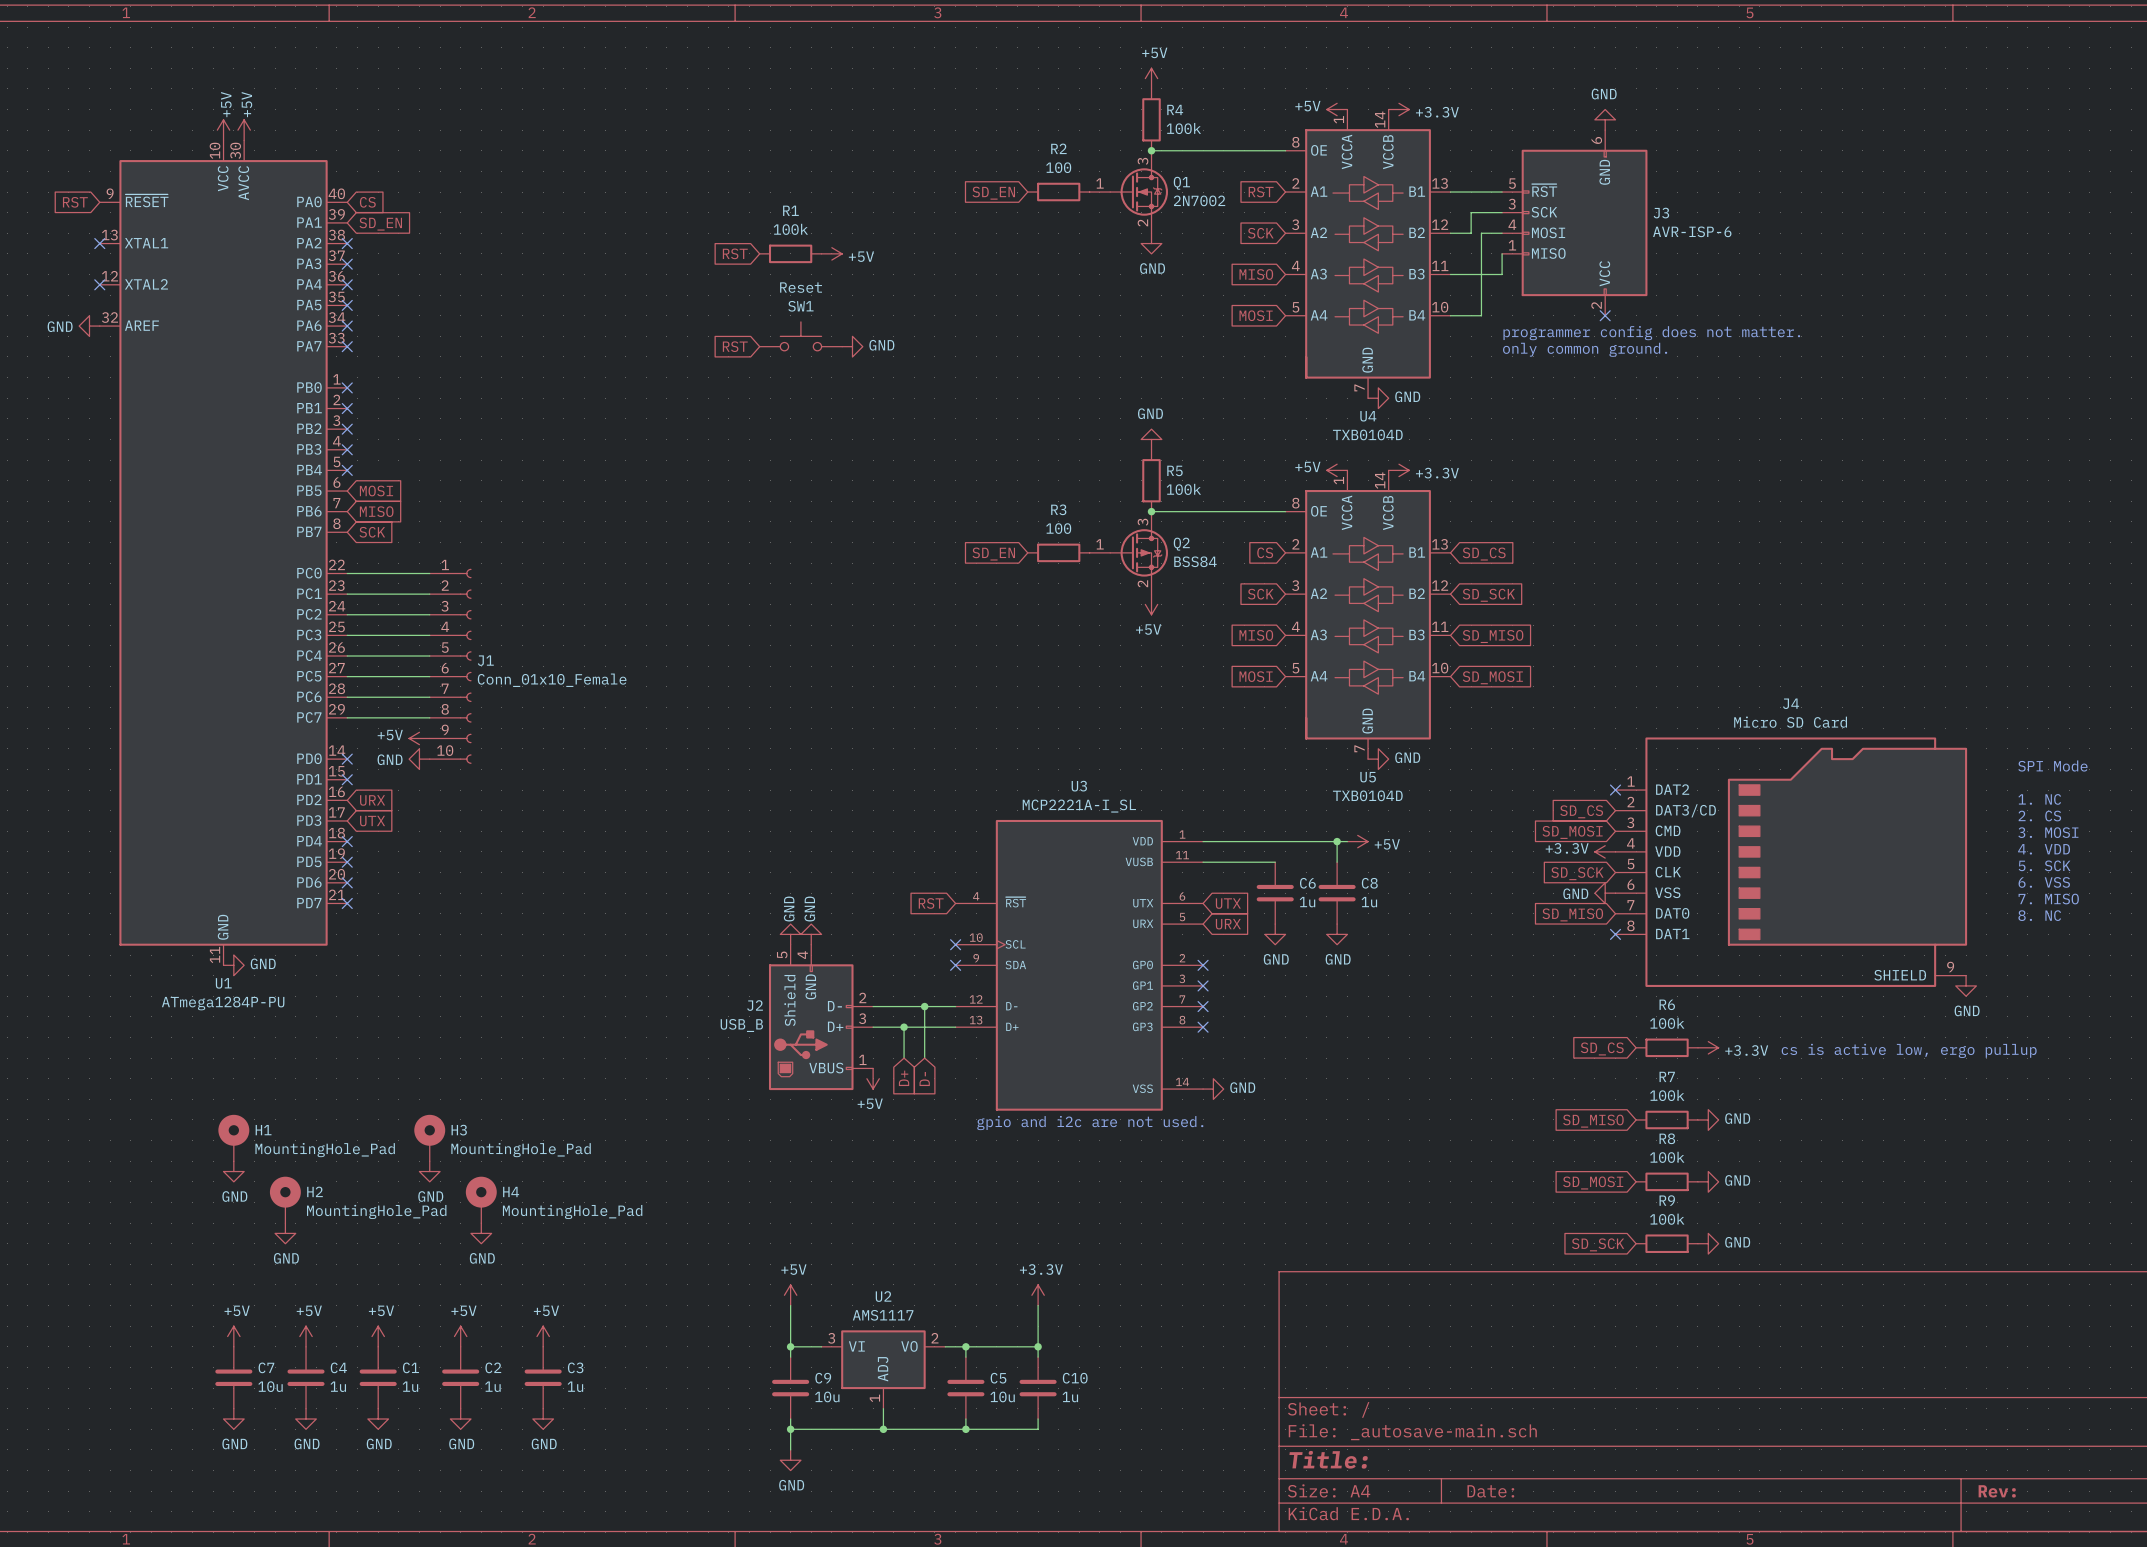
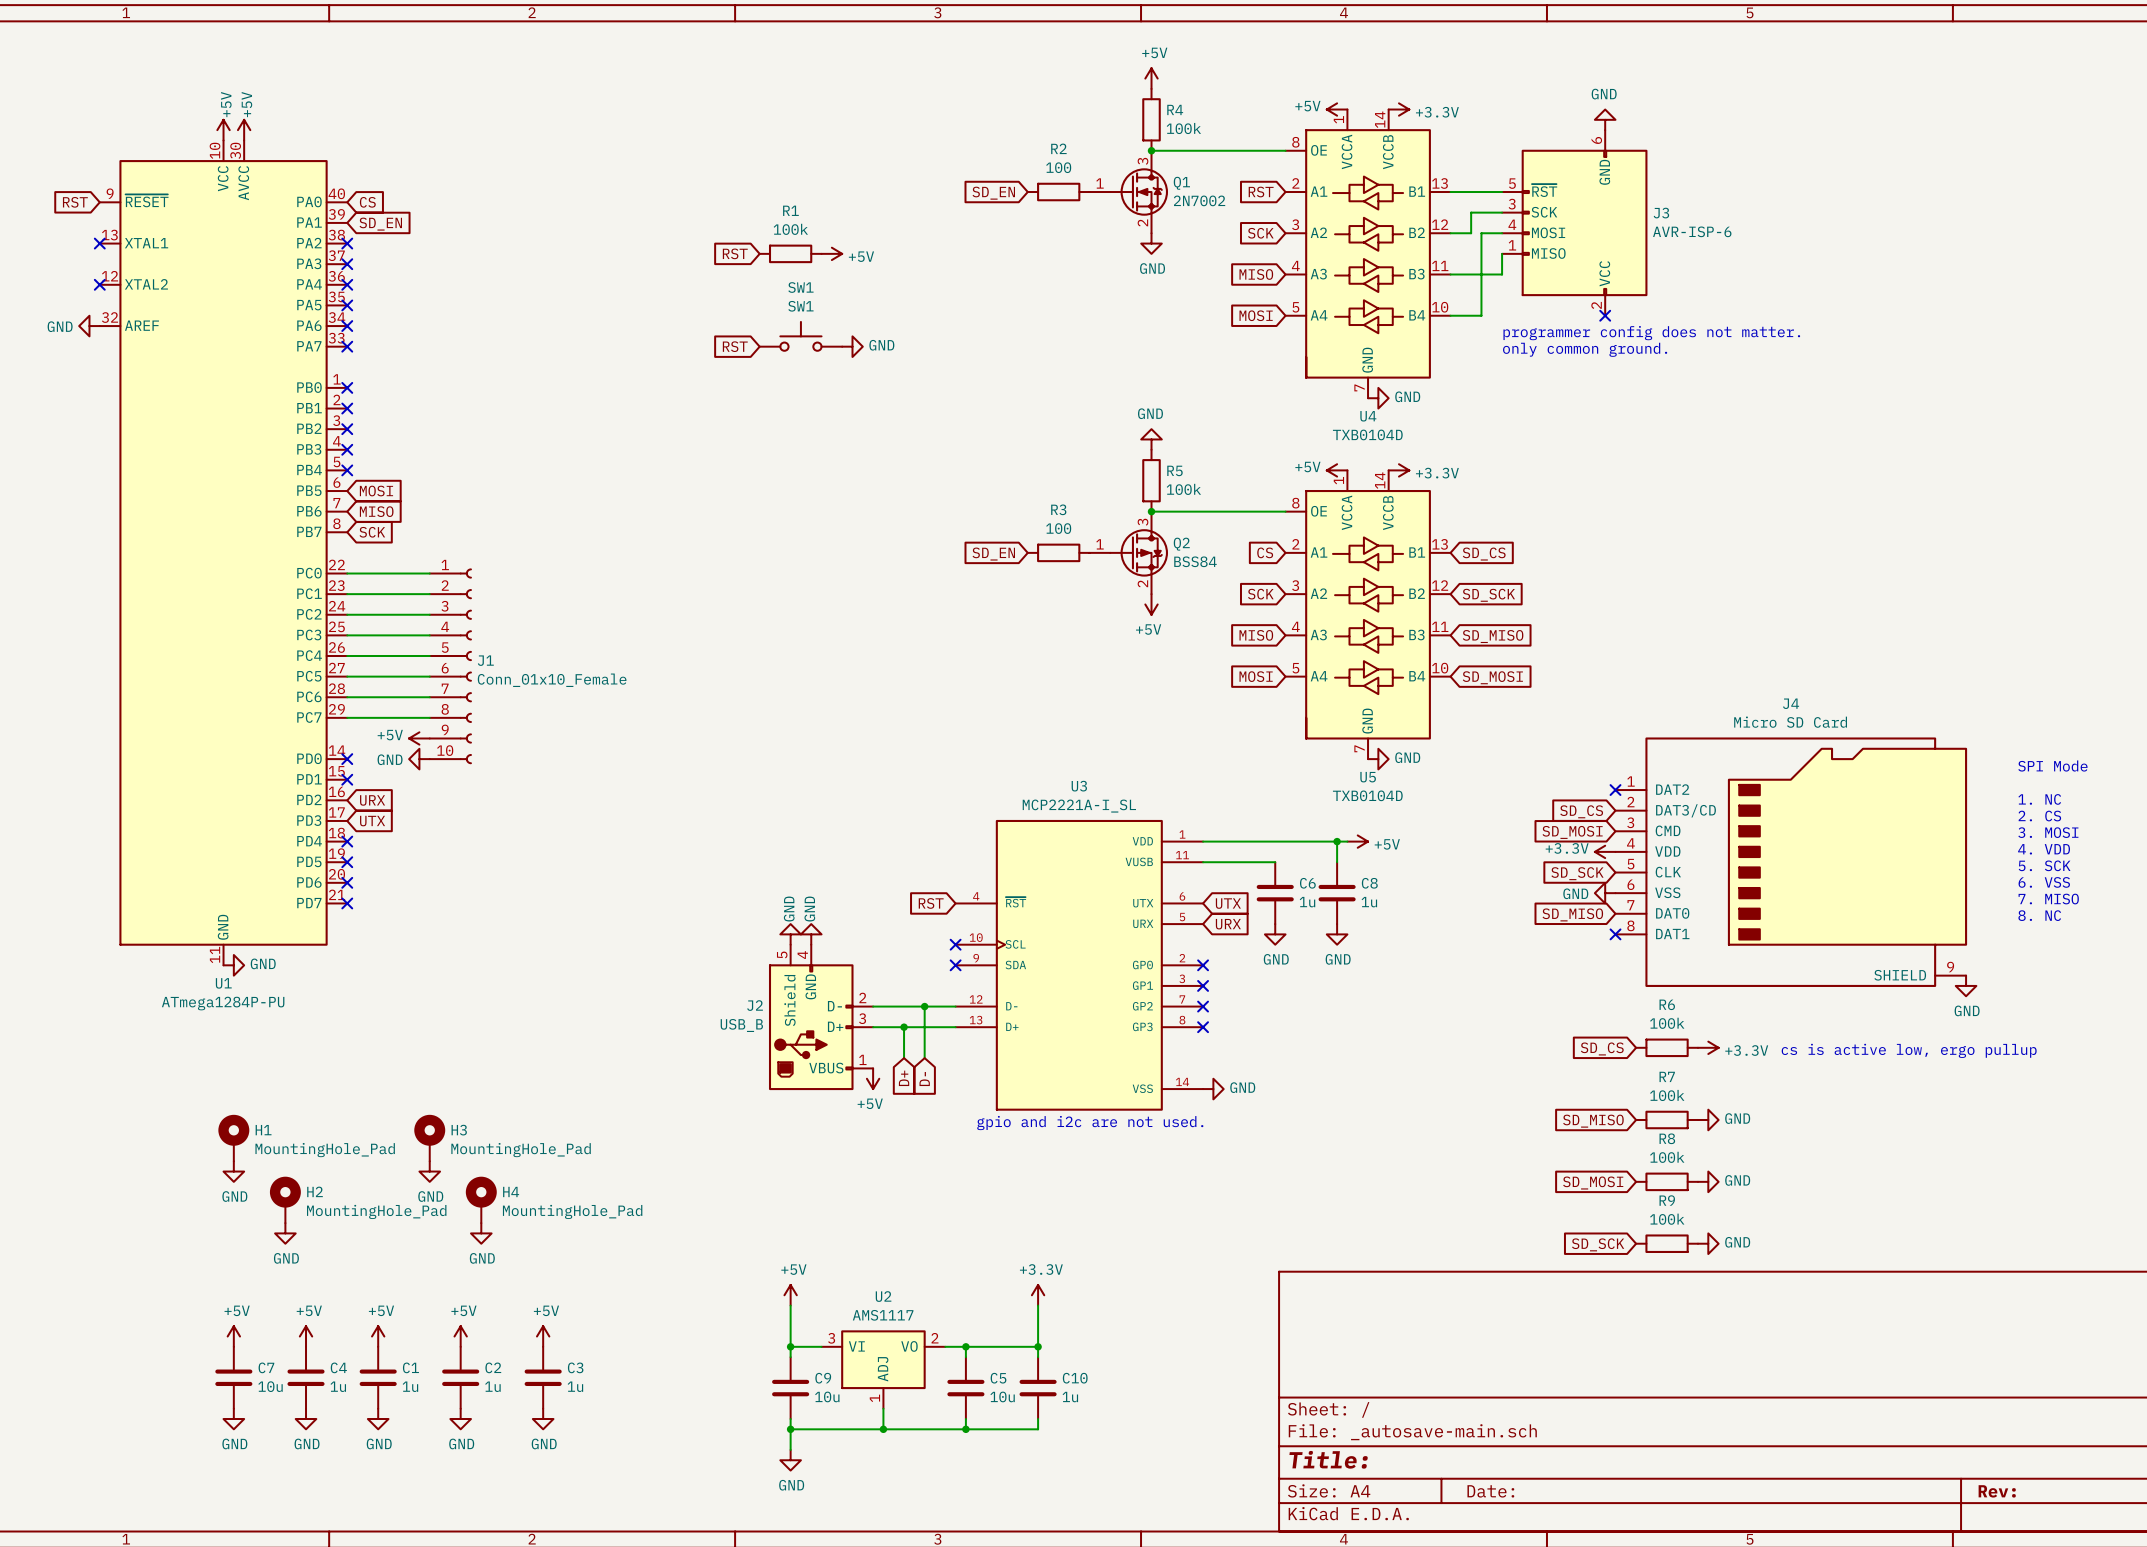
Reset name: Reset (801, 287) -> SW1 (800, 287)

